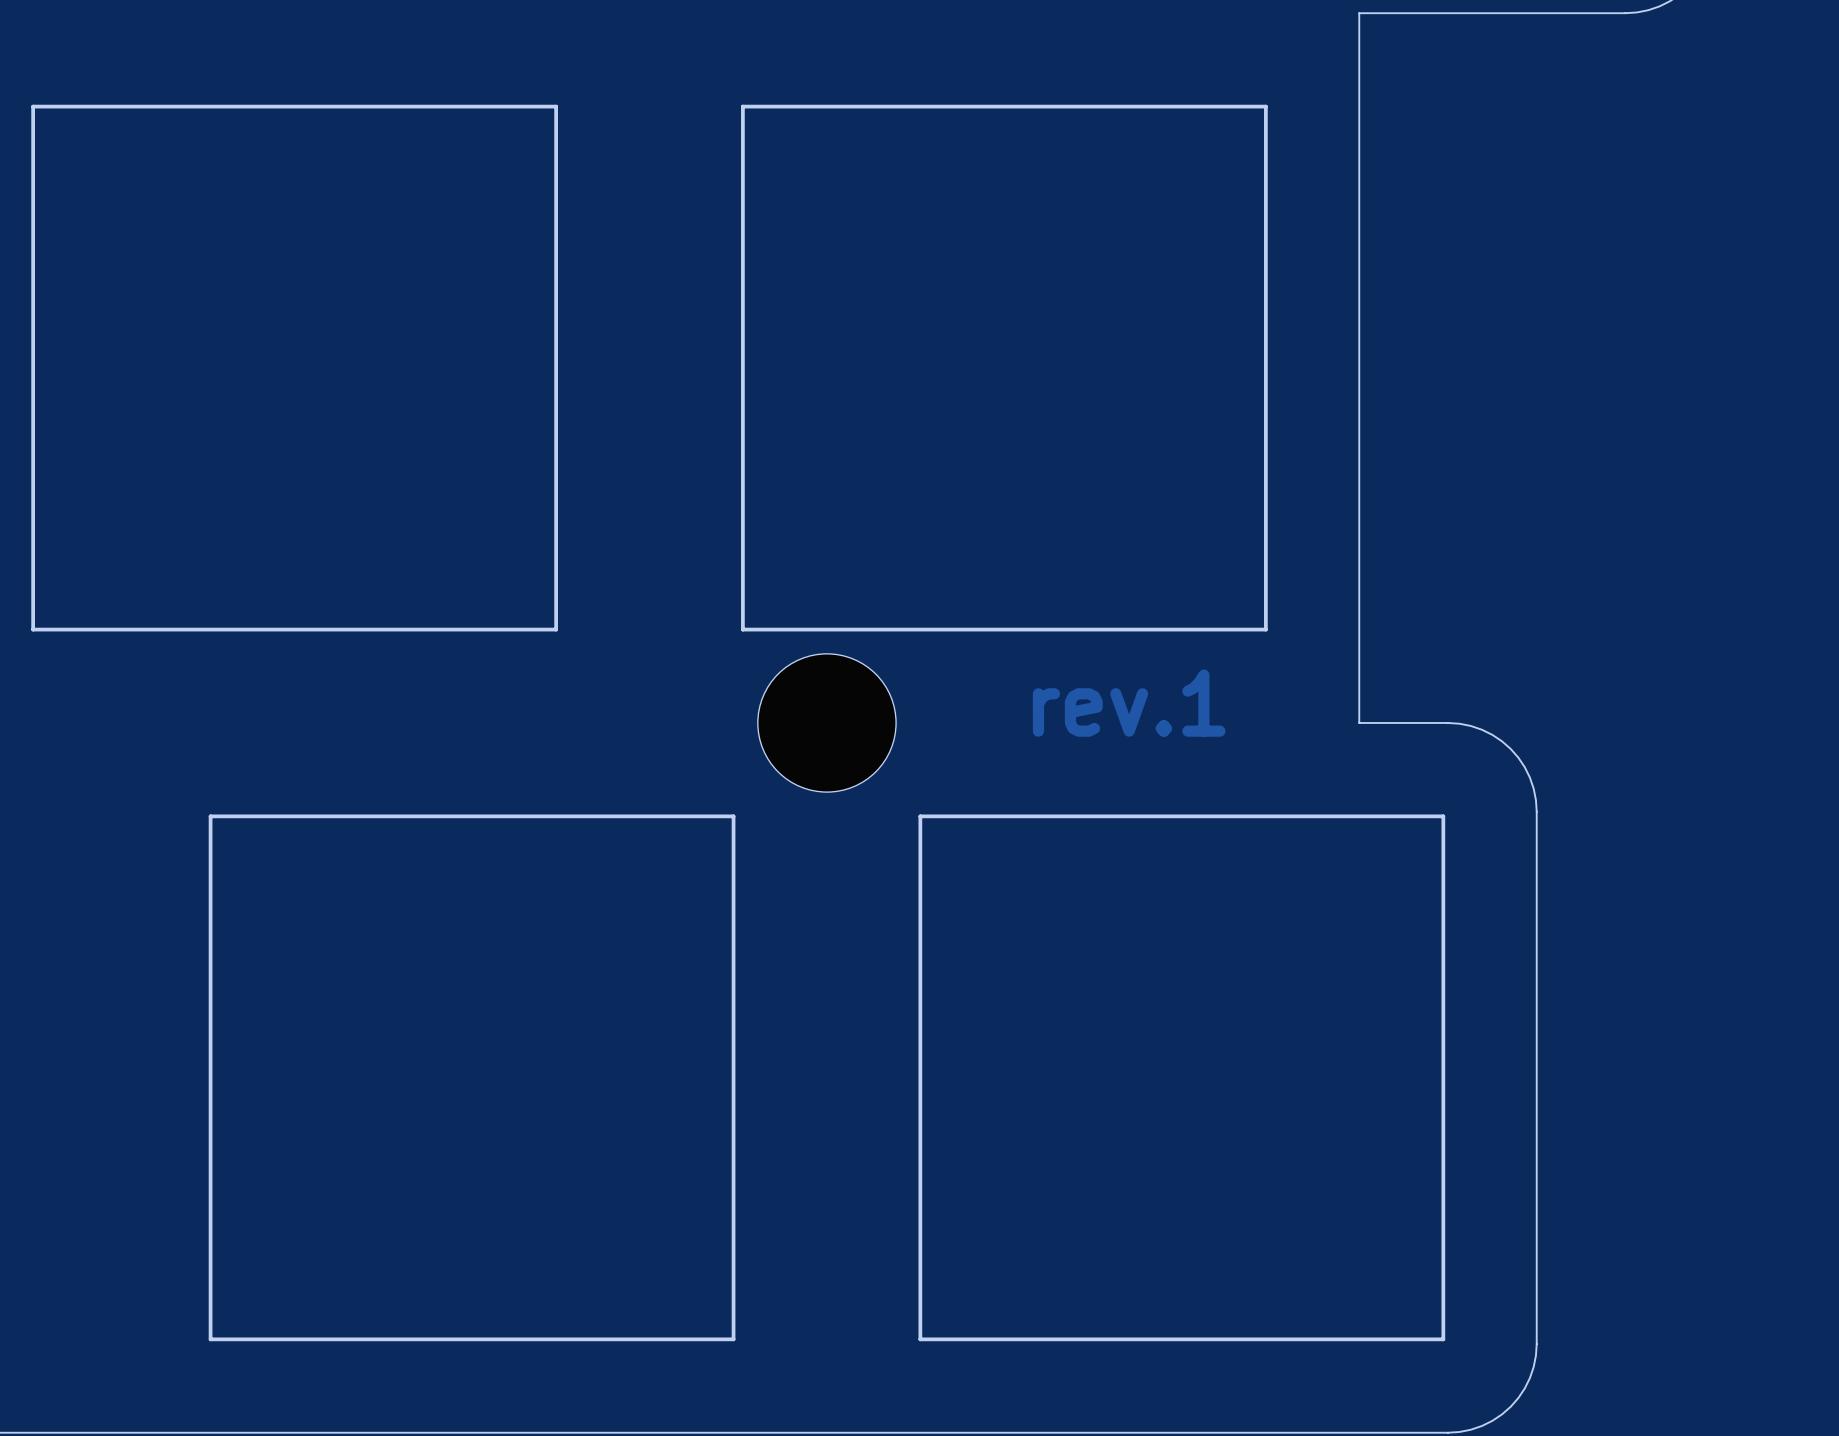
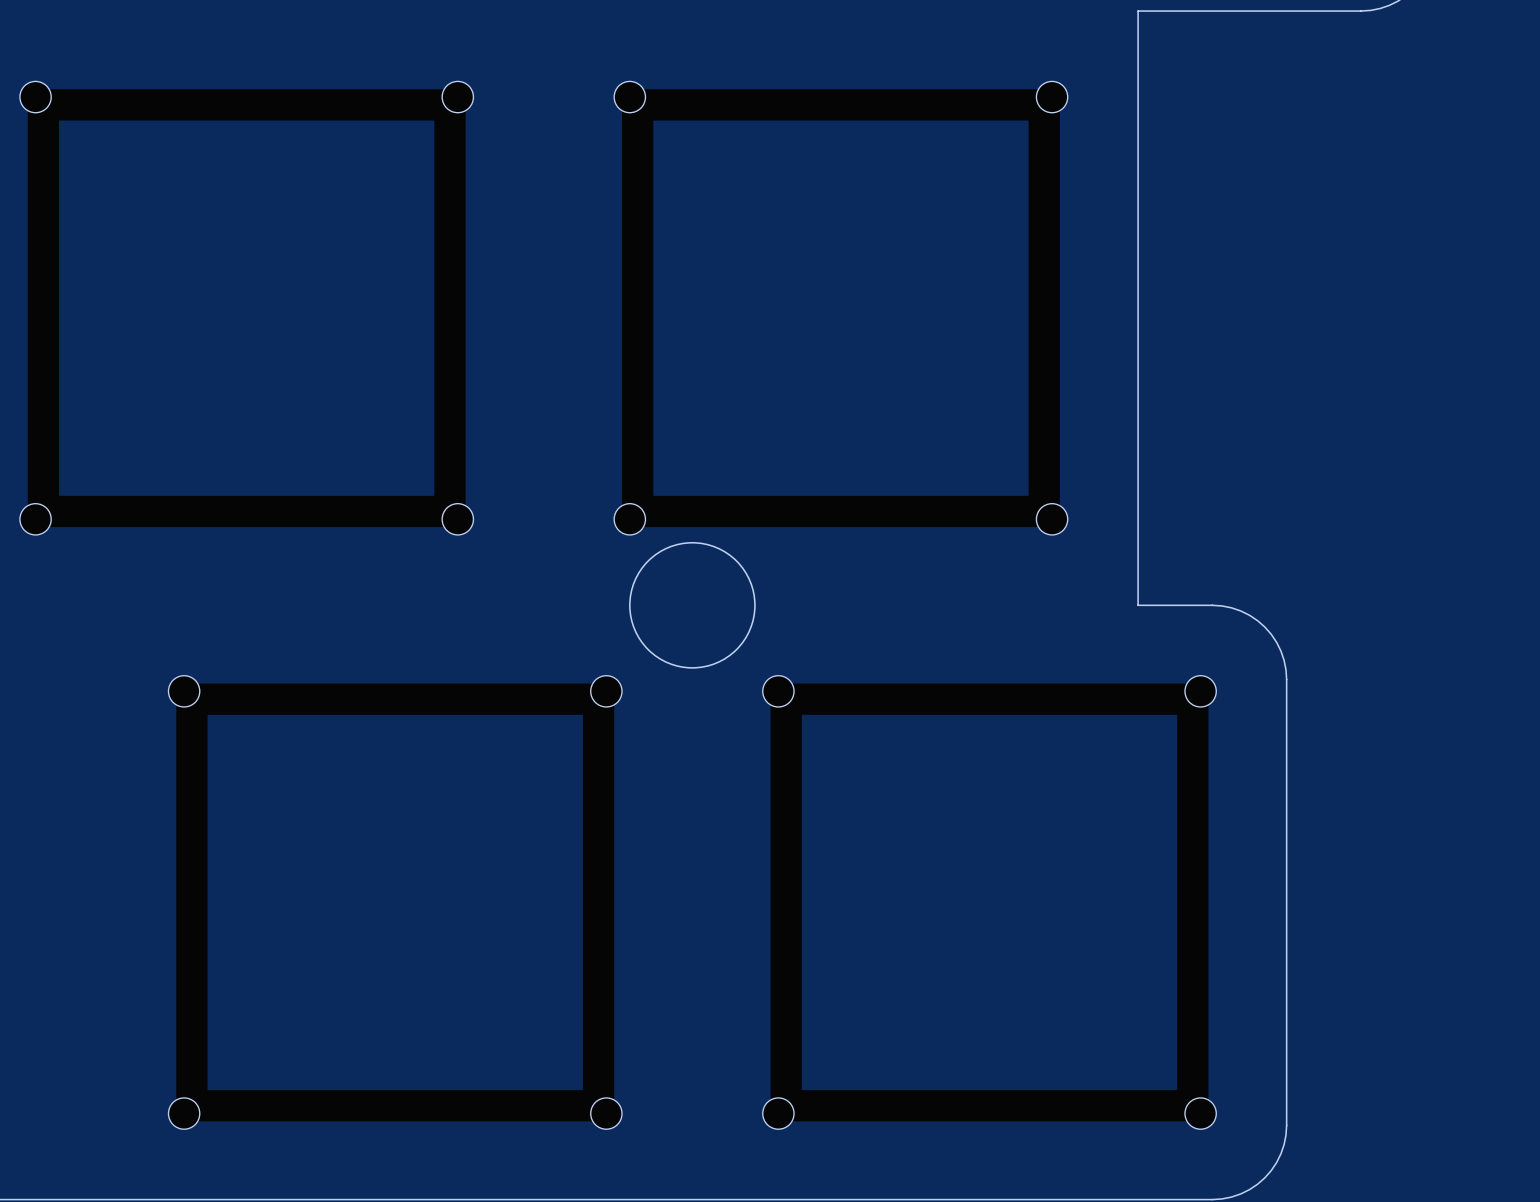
drawing: [31, 104, 558, 632] -> none
drawing: [741, 104, 1268, 632] -> none
part: none -> (246, 308)
part: none -> (840, 308)
round board edge: none -> [629, 541, 756, 669]
text: rev.1 (1129, 703) -> none
part: (826, 722) -> none
drawing: [208, 814, 736, 1342] -> none
drawing: [918, 814, 1446, 1342] -> none
part: none -> (395, 902)
part: none -> (989, 902)

